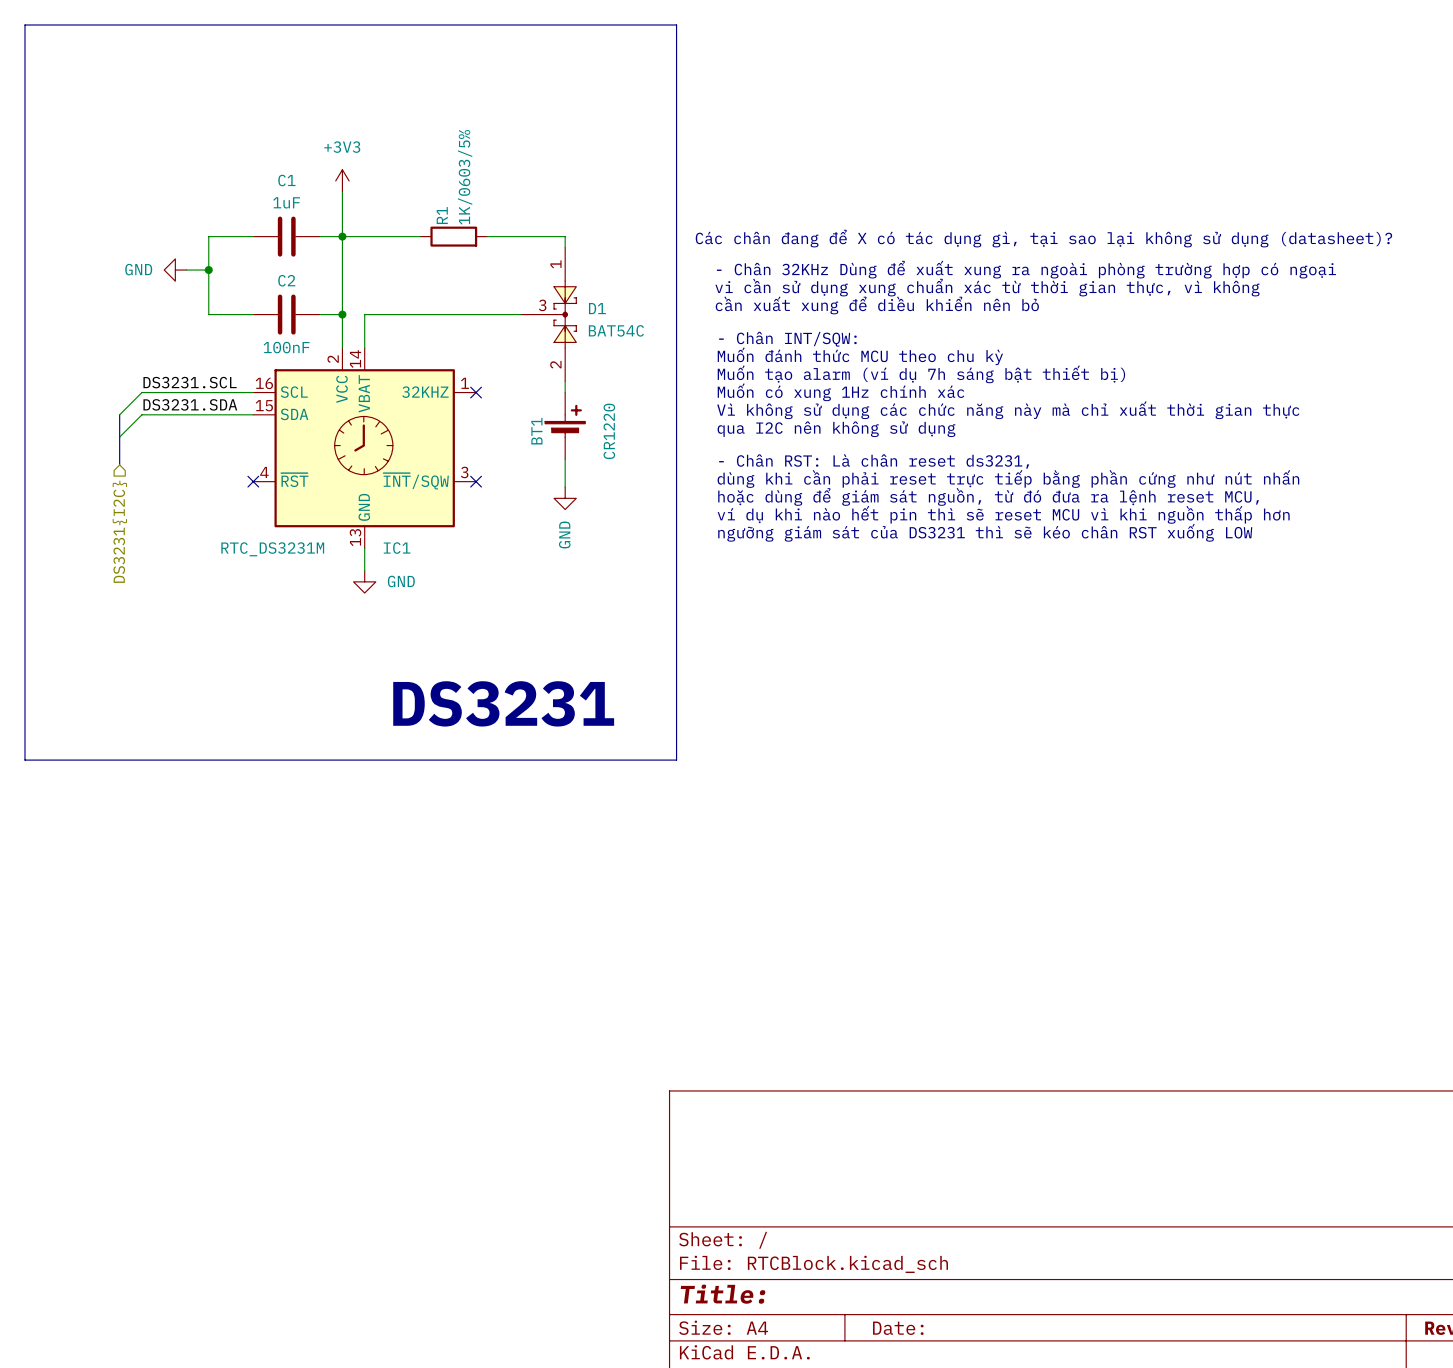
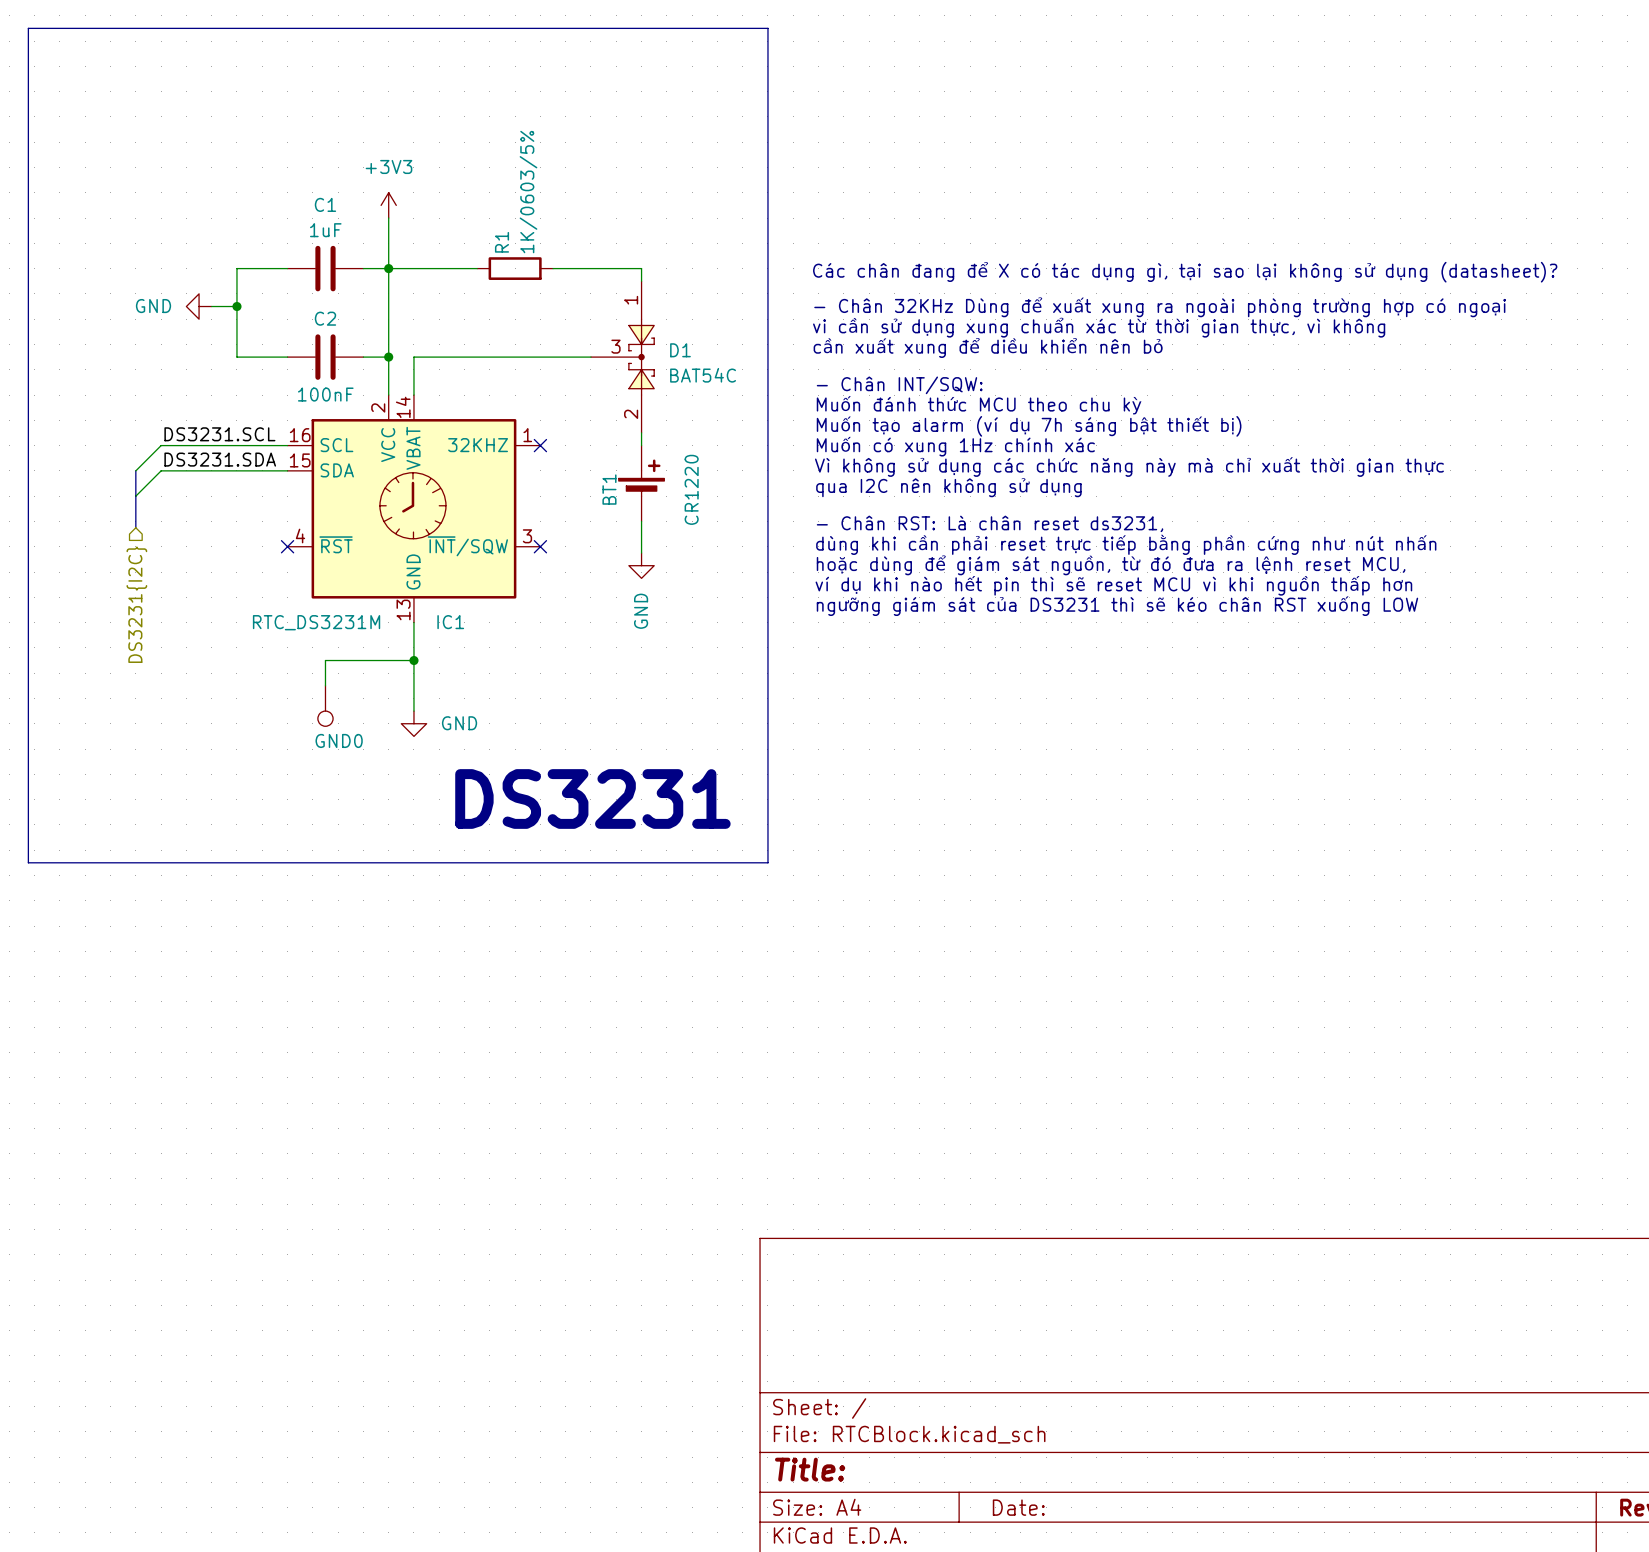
wire: none -> (413, 647) (413, 711)
wire: none -> (413, 660) (325, 660) (325, 685)
power symbol position: GND (364, 581) -> GND (413, 723)
junction: none -> (413, 660)
GND0: none -> (325, 706)

